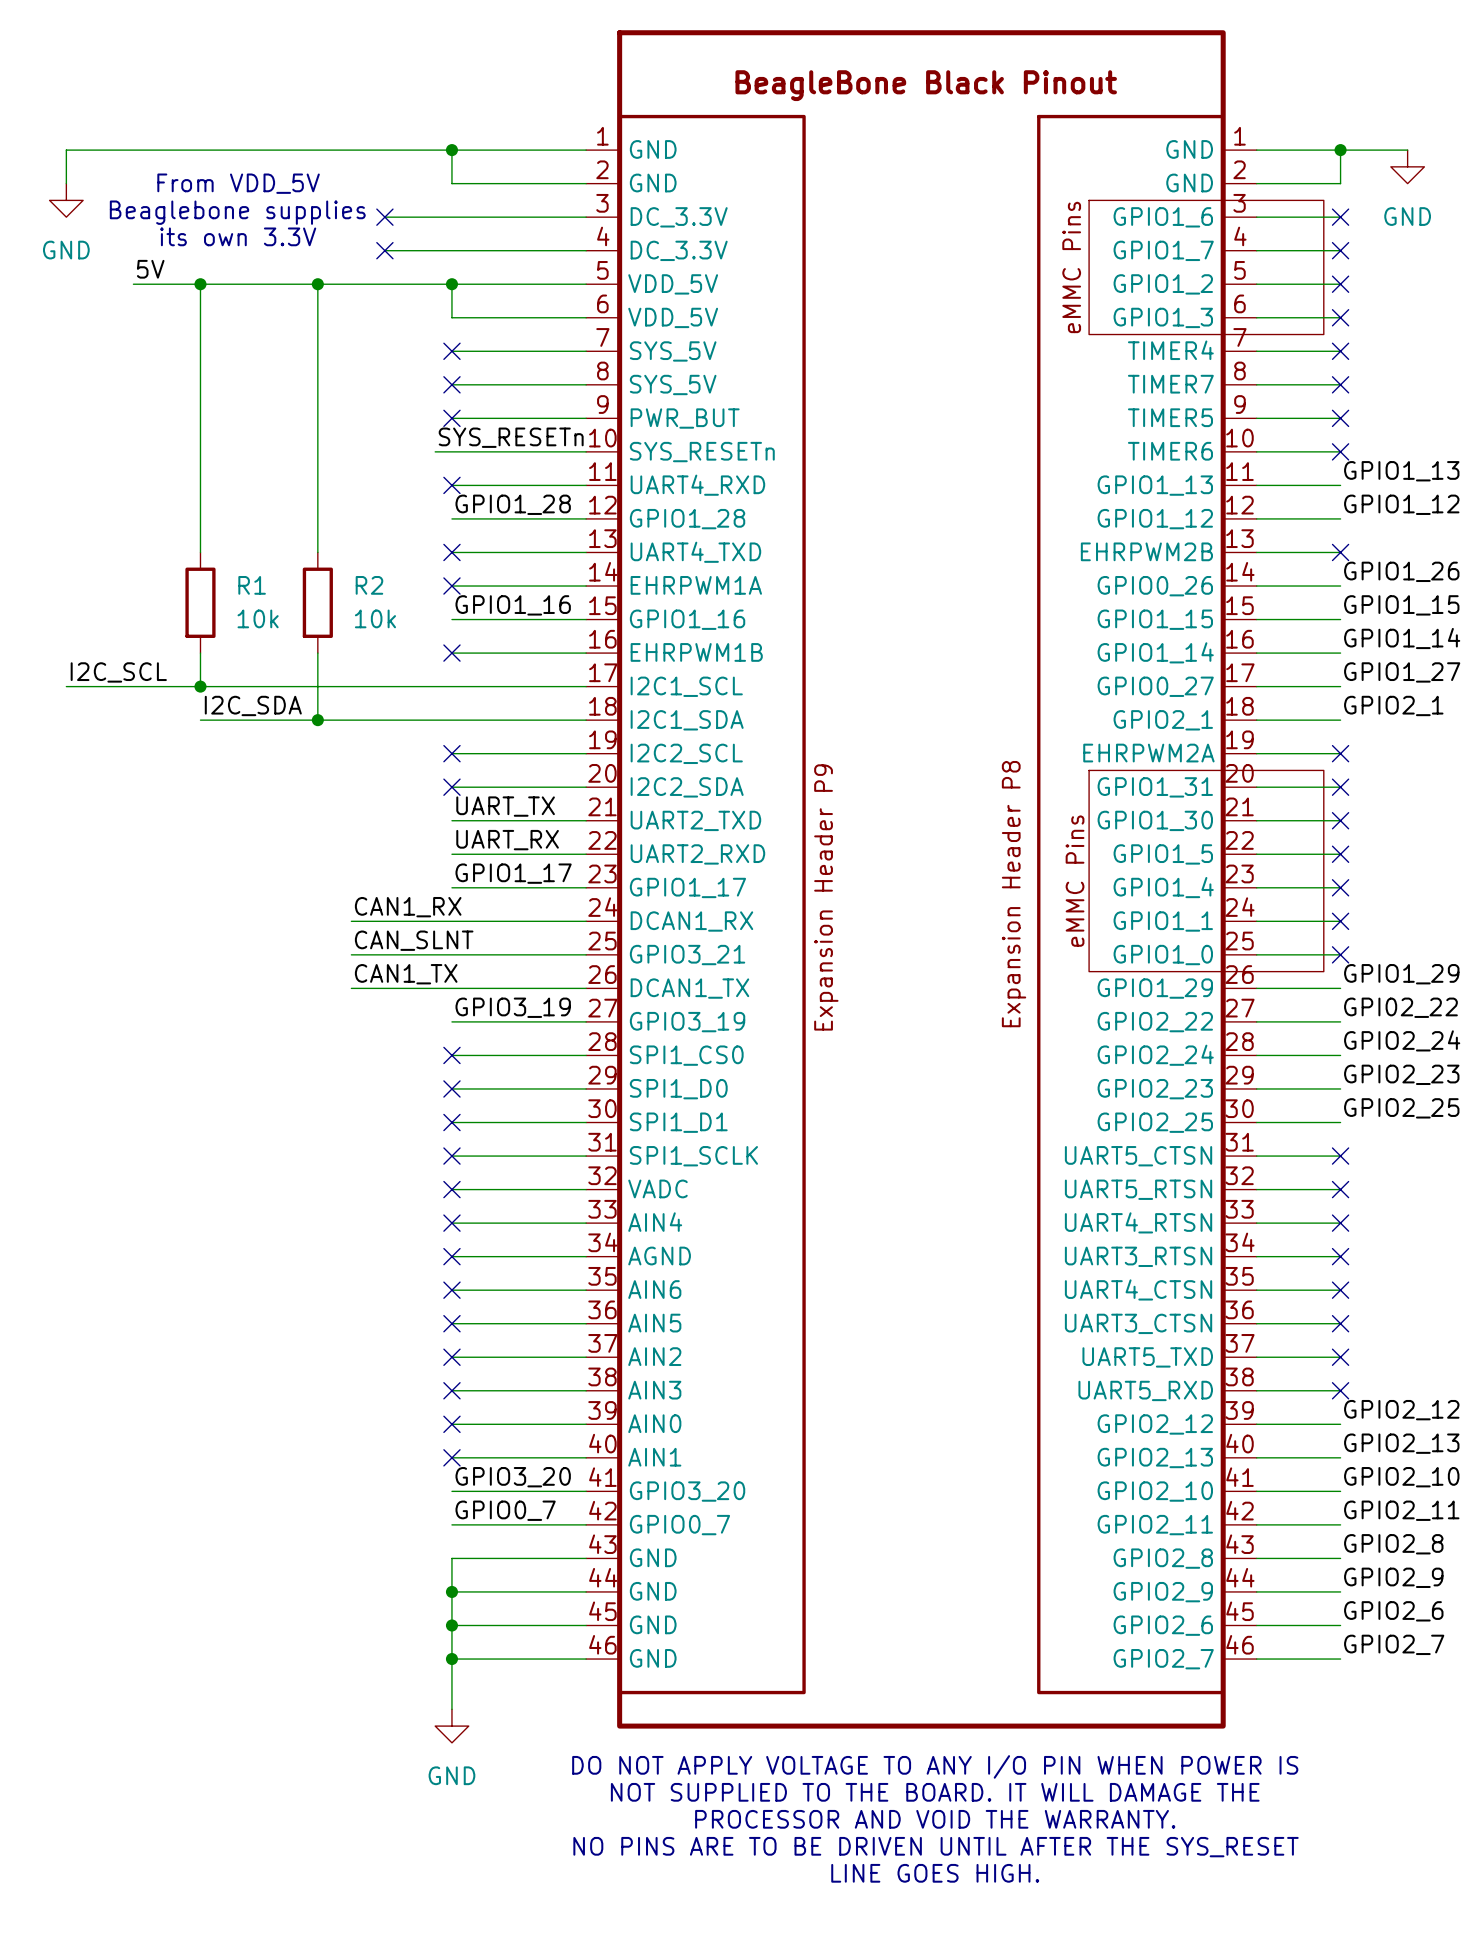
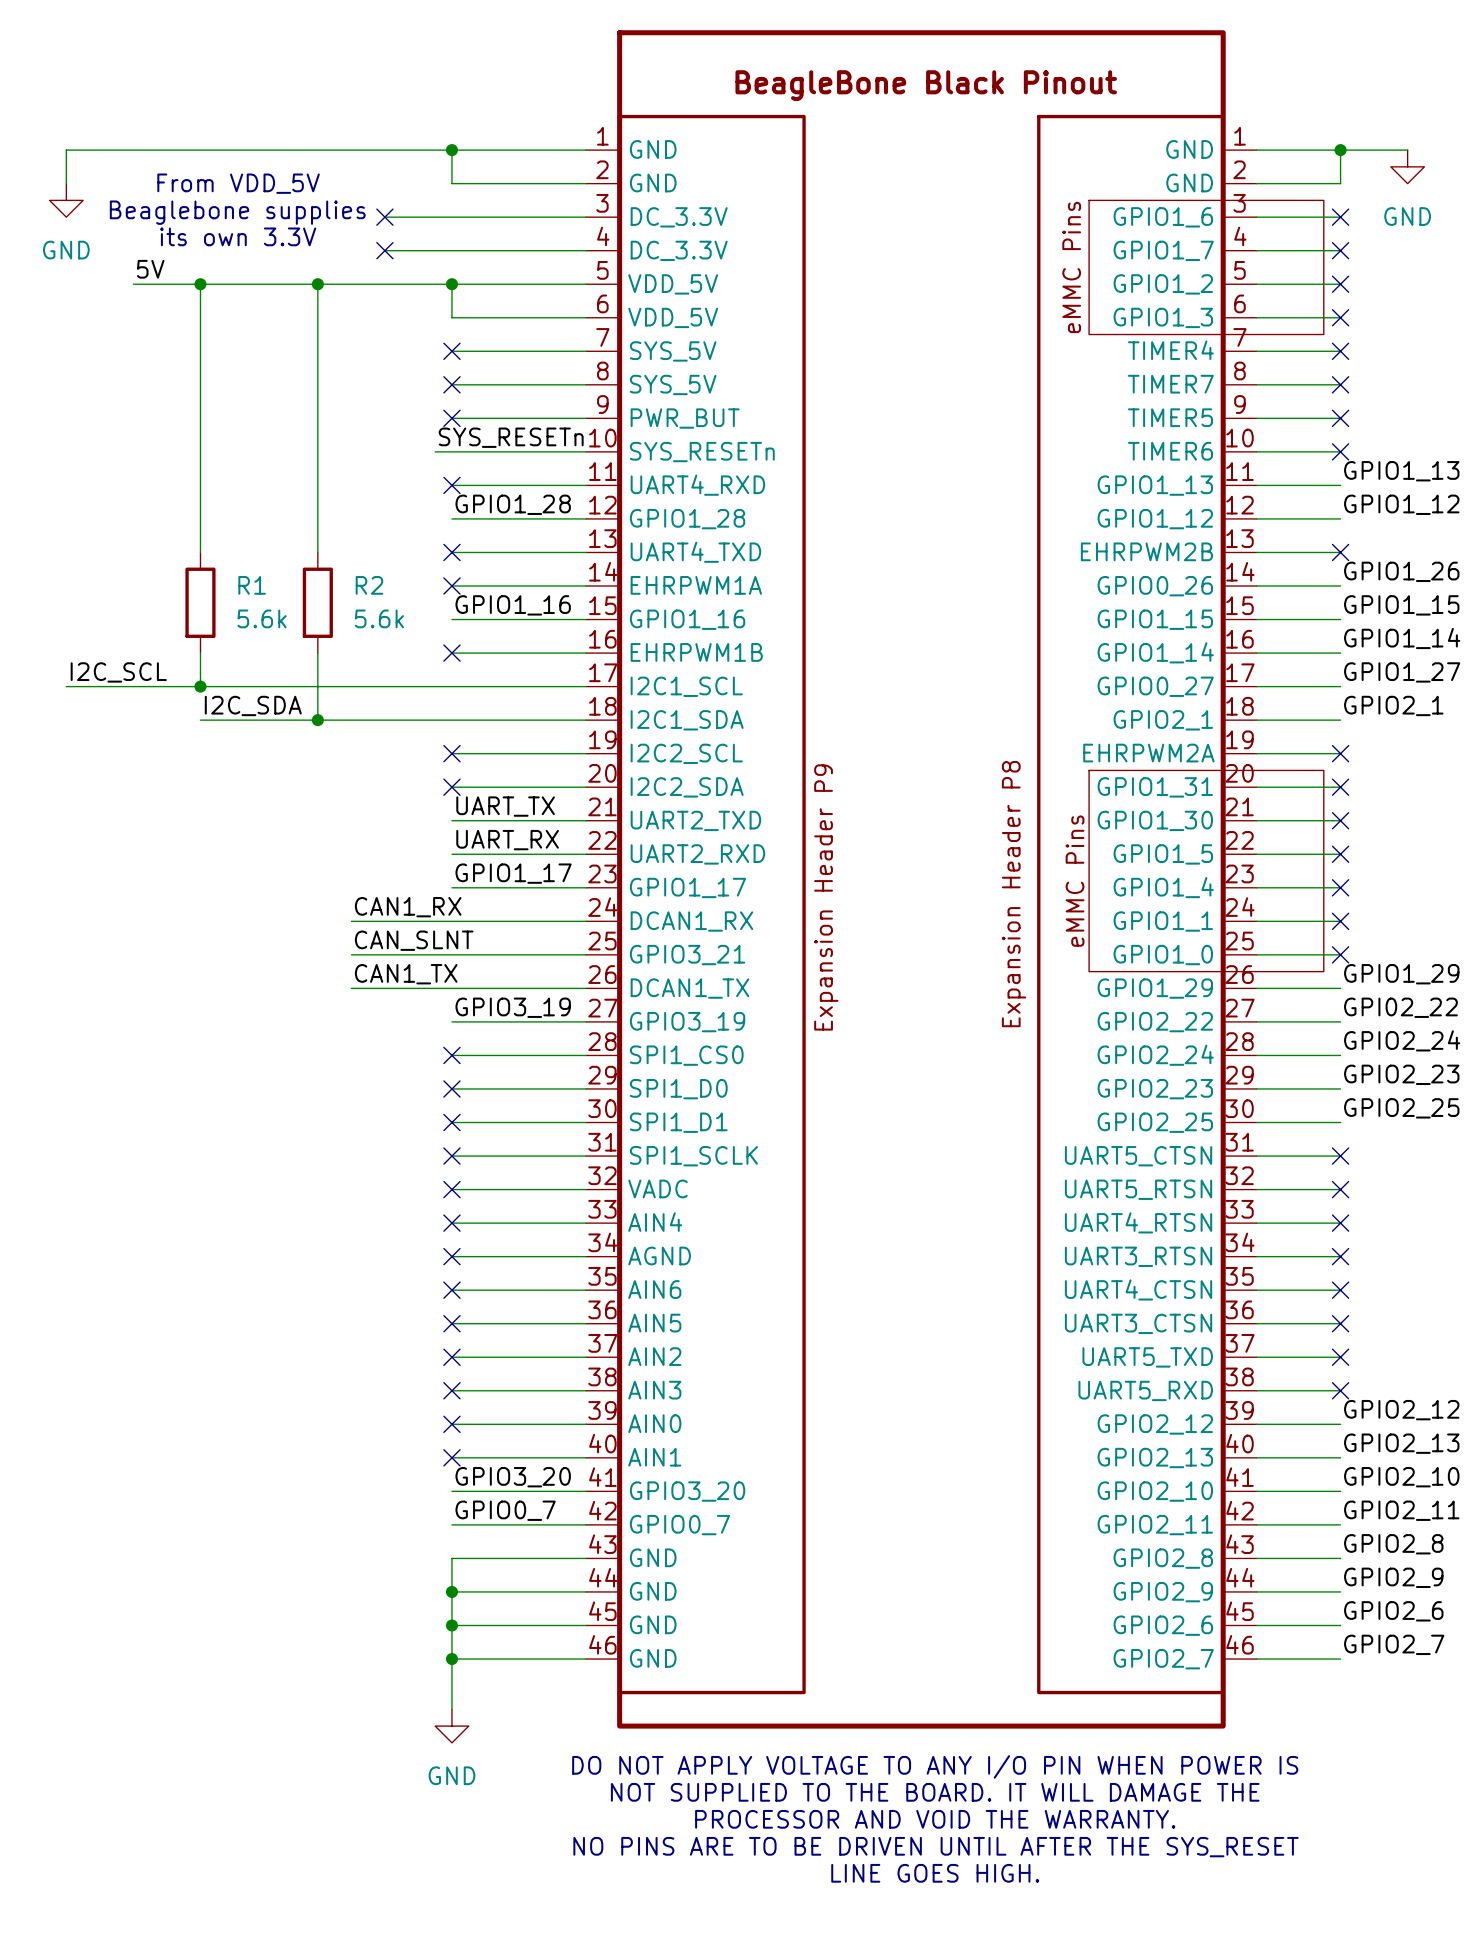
R1 value: 10k (258, 618) -> 5.6k (262, 618)
R2 value: 10k (375, 618) -> 5.6k (379, 618)

